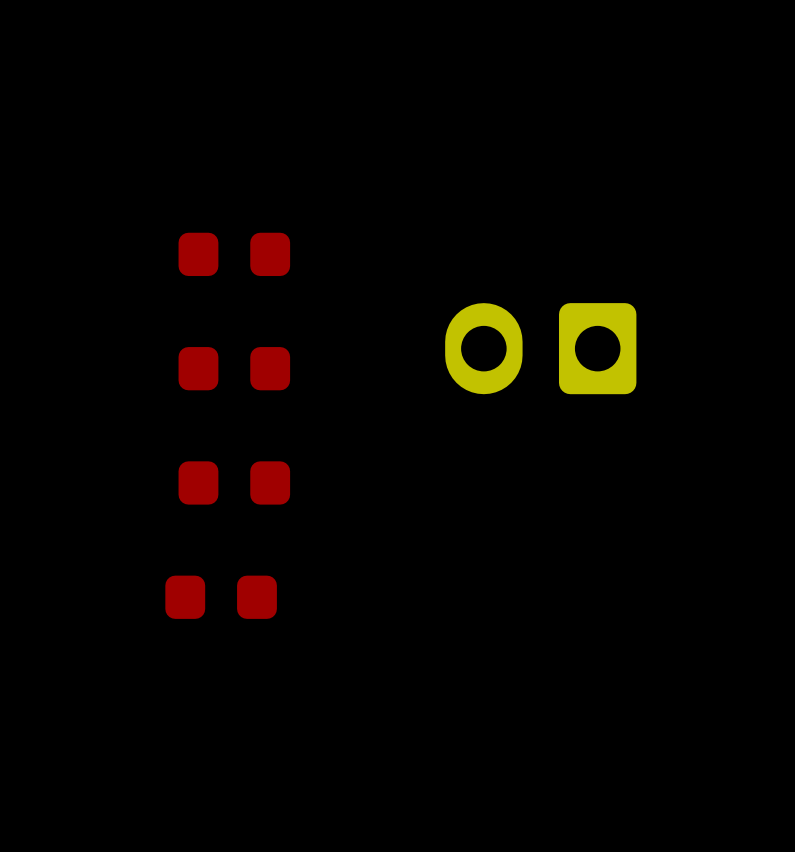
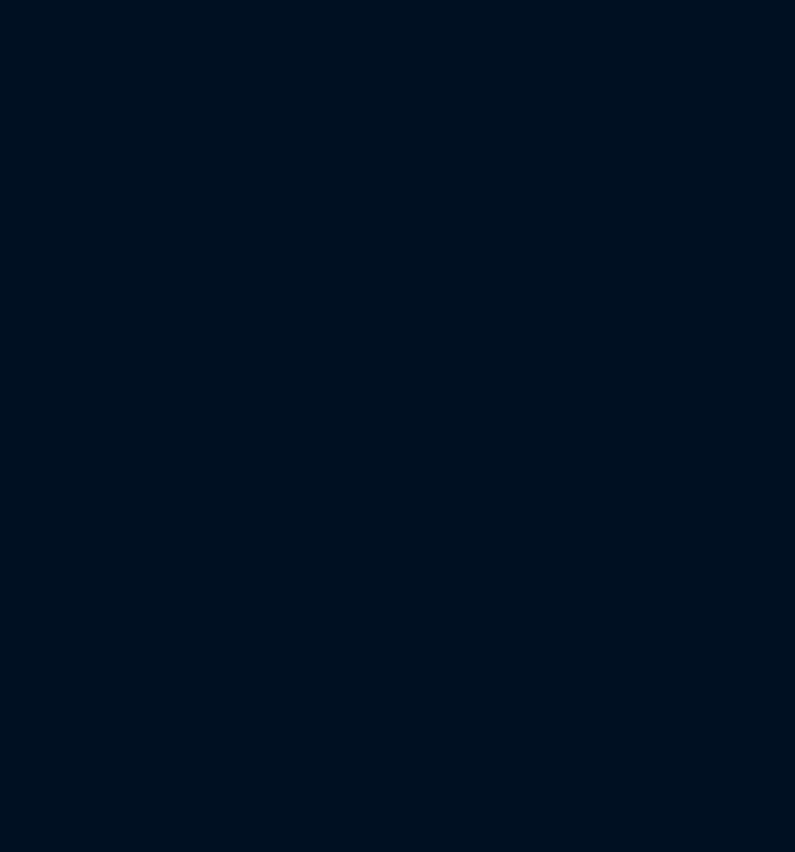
part: (234, 254) -> none
part: (540, 348) -> none
part: (234, 368) -> none
part: (234, 482) -> none
part: (221, 597) -> none

